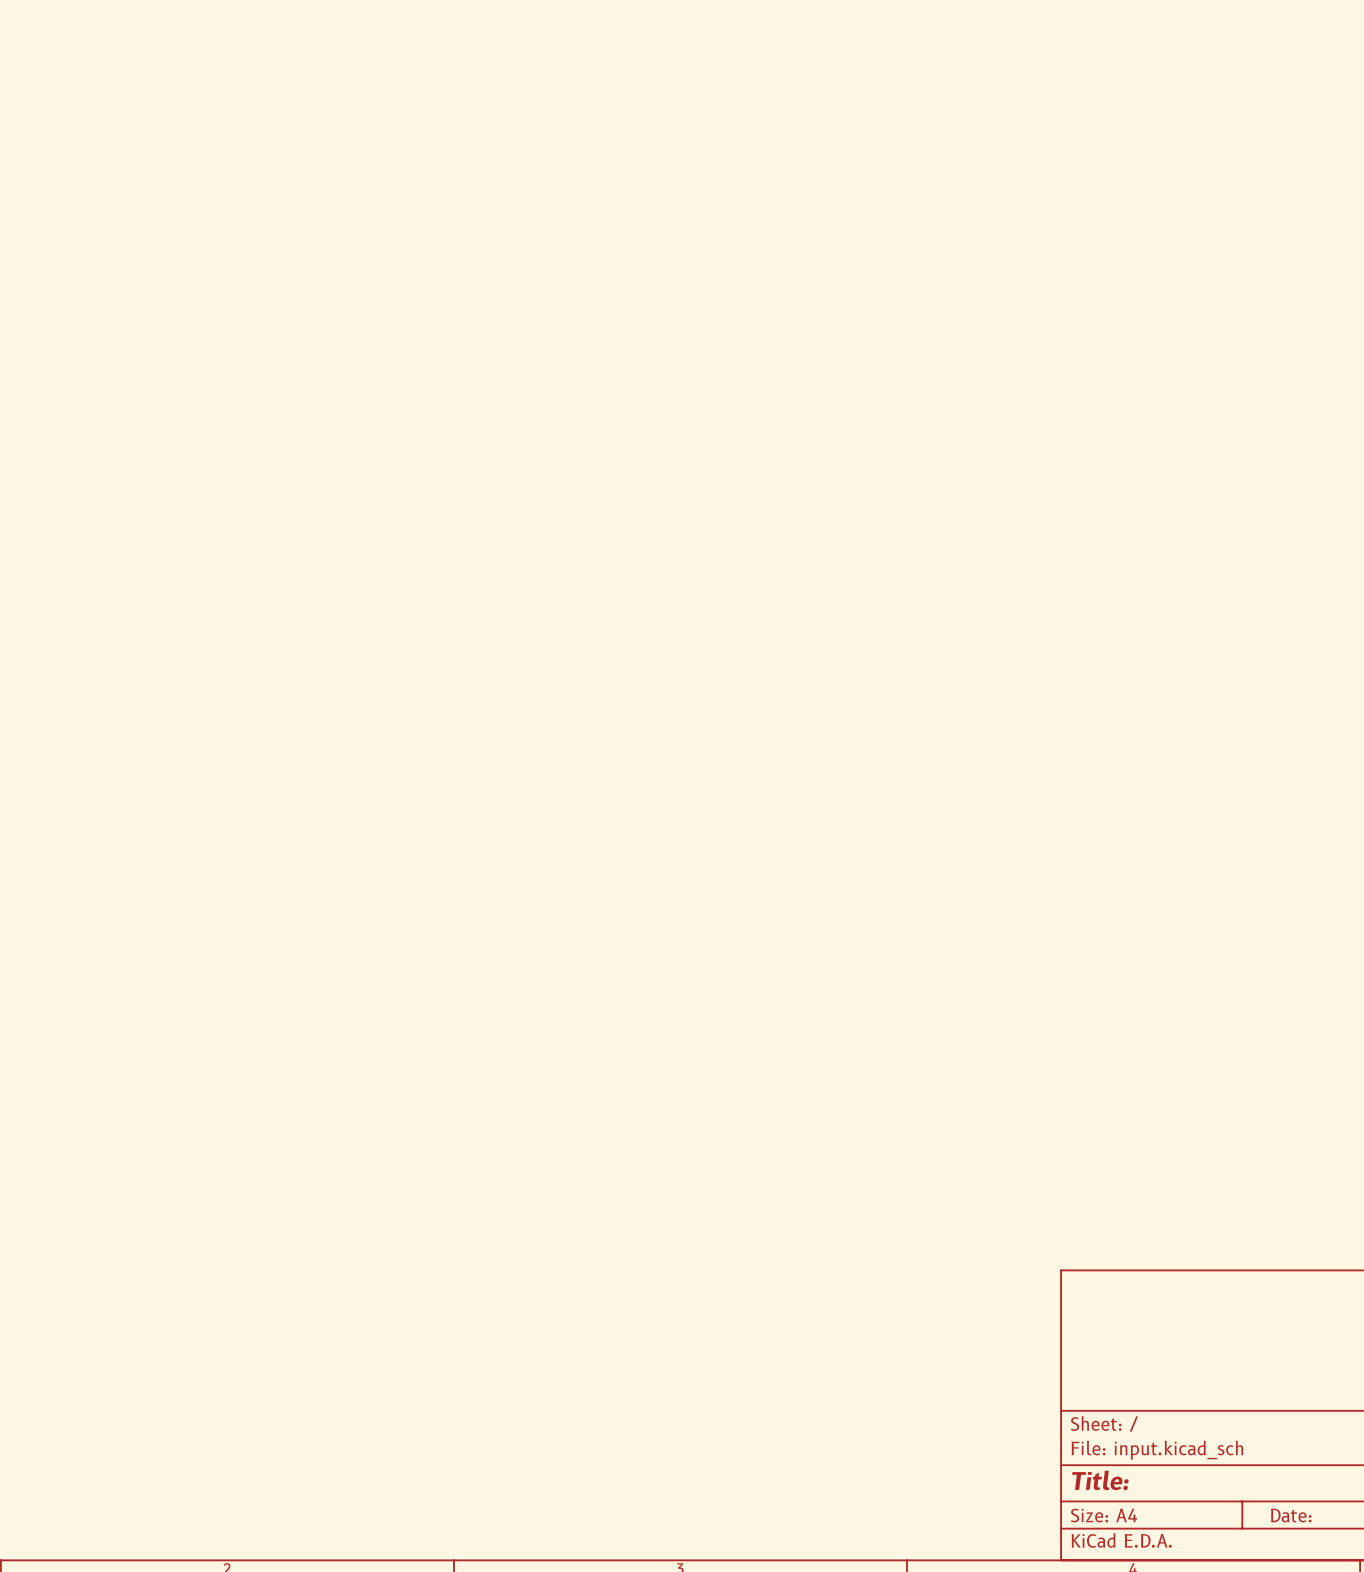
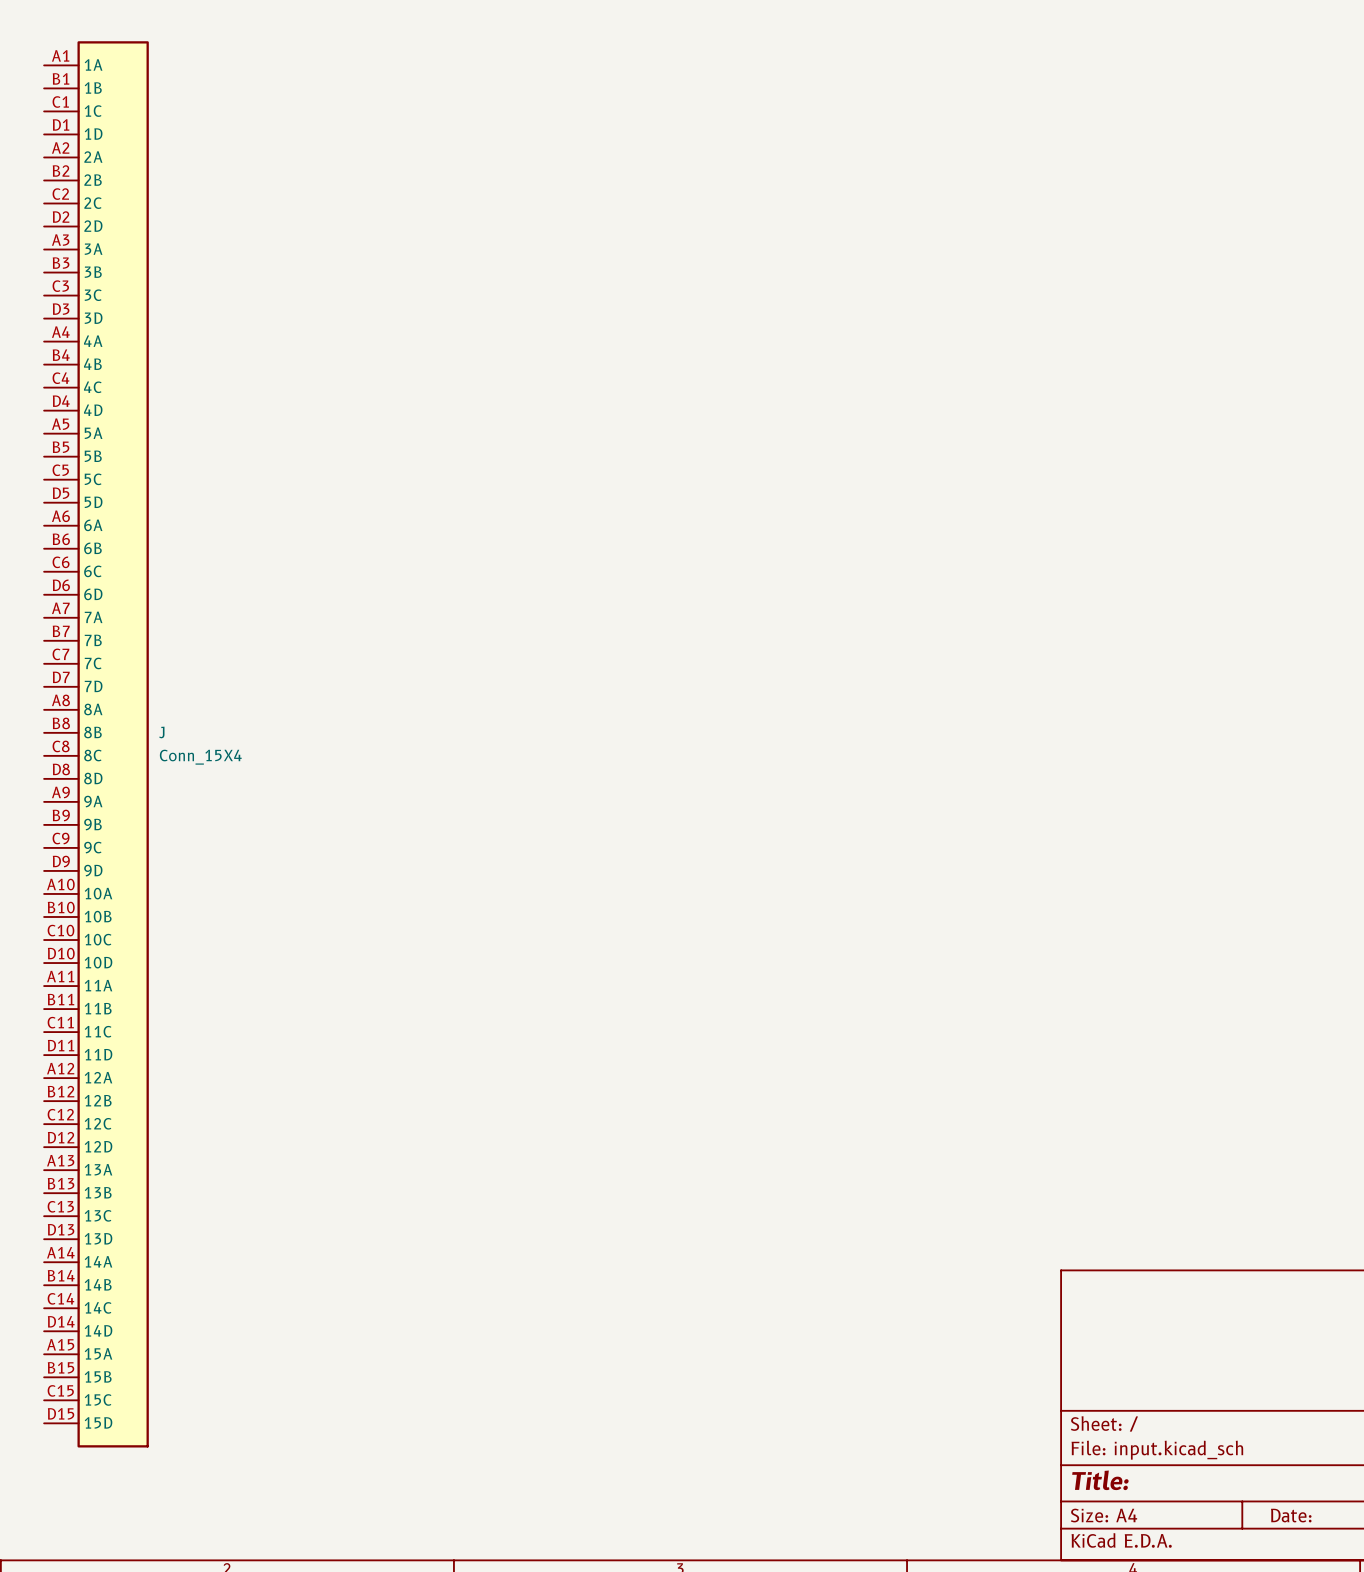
J: none -> Conn_15X4 (96, 744)

